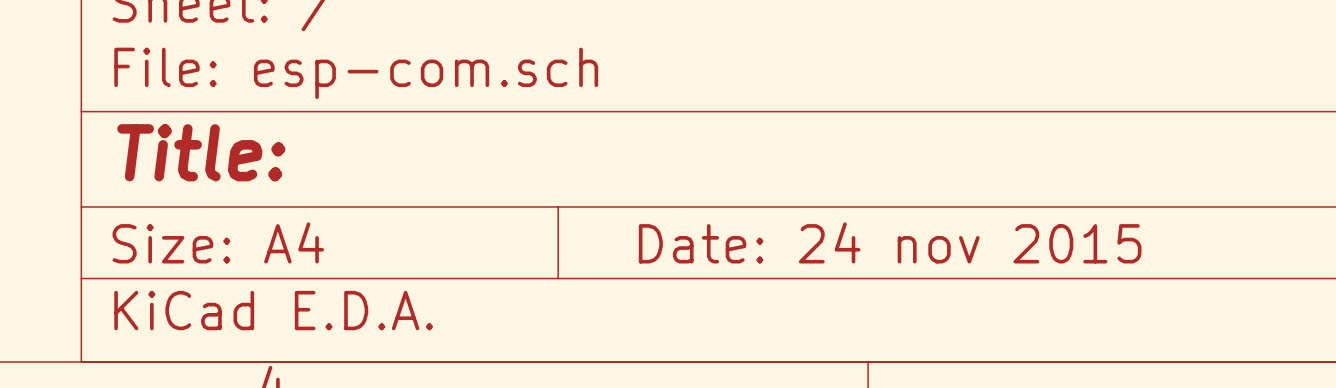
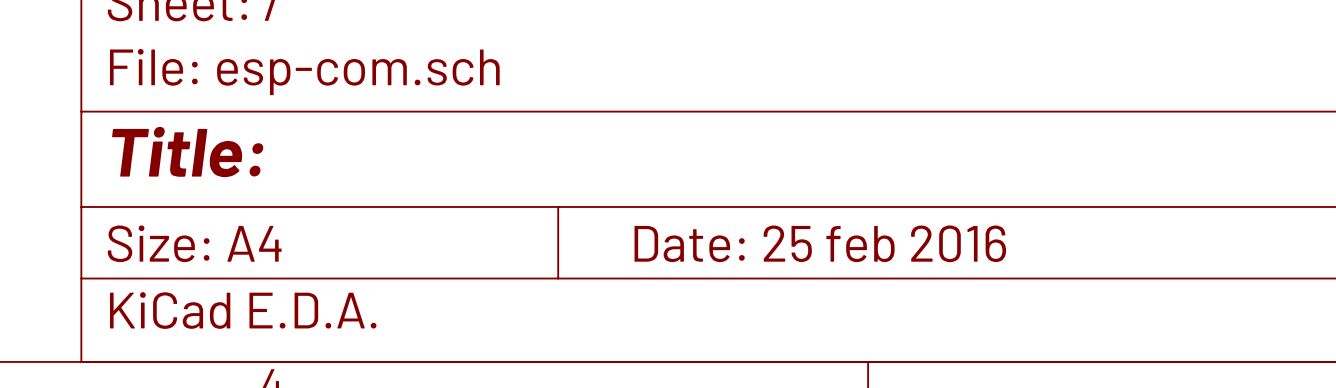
title block: Date: 24 nov 2015 (890, 242) -> Date: 25 feb 2016 (820, 243)

